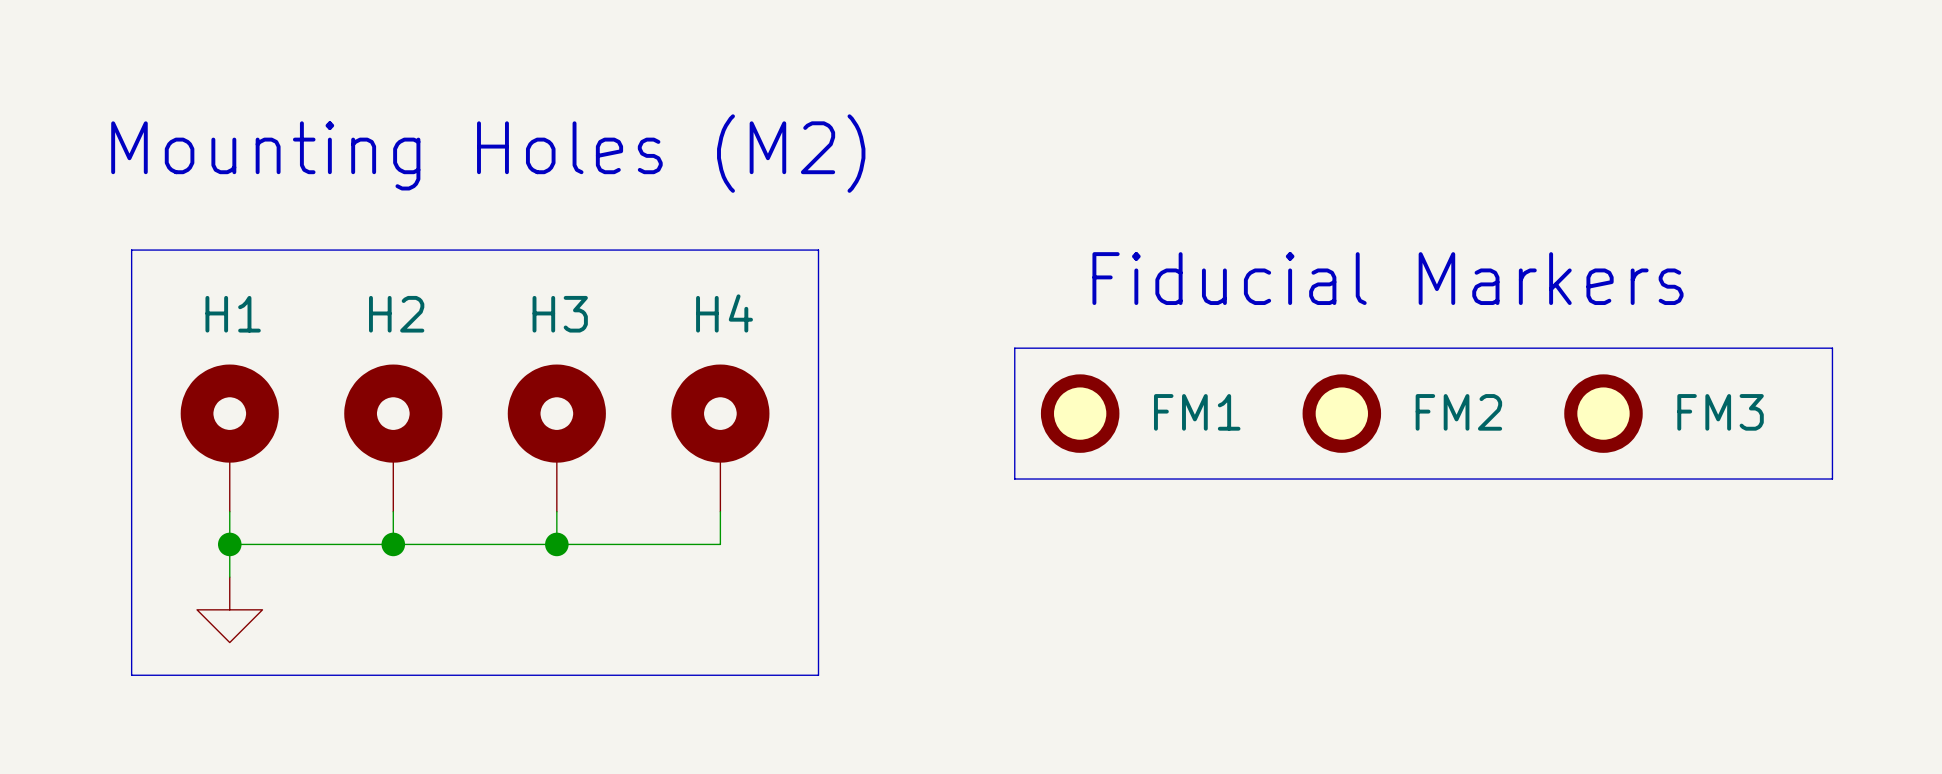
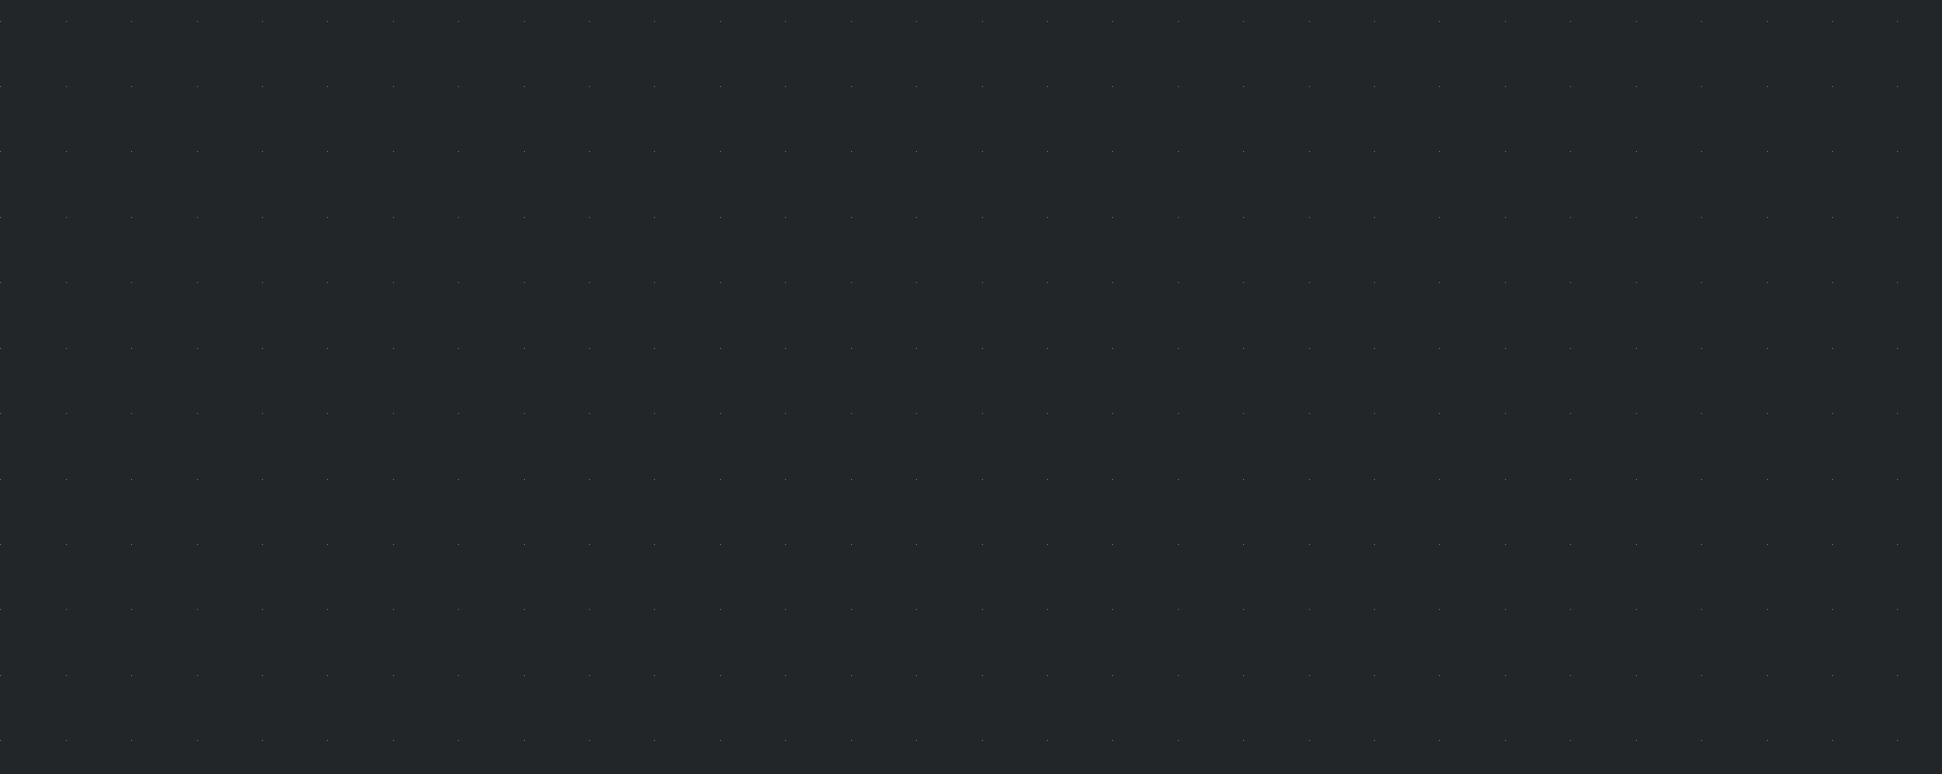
text: Mounting Holes (M2) (488, 153) -> none
line: (131, 250) (818, 250) (818, 675) (131, 675) (131, 250) -> none
text: Fiducial Markers (1388, 278) -> none
line: (1014, 348) (1832, 348) (1832, 479) (1014, 479) (1014, 348) -> none
FM1: (1080, 413) -> none
FM2: (1341, 413) -> none
FM3: (1603, 413) -> none
H1: (229, 438) -> none
H2: (393, 438) -> none
H3: (556, 438) -> none
H4: (720, 438) -> none
wire: (229, 511) (229, 577) -> none
wire: (393, 511) (393, 544) -> none
wire: (556, 511) (556, 544) -> none
wire: (720, 511) (720, 544) (229, 544) -> none
junction: (229, 544) -> none
junction: (393, 544) -> none
junction: (556, 544) -> none
power symbol: (229, 609) -> none

